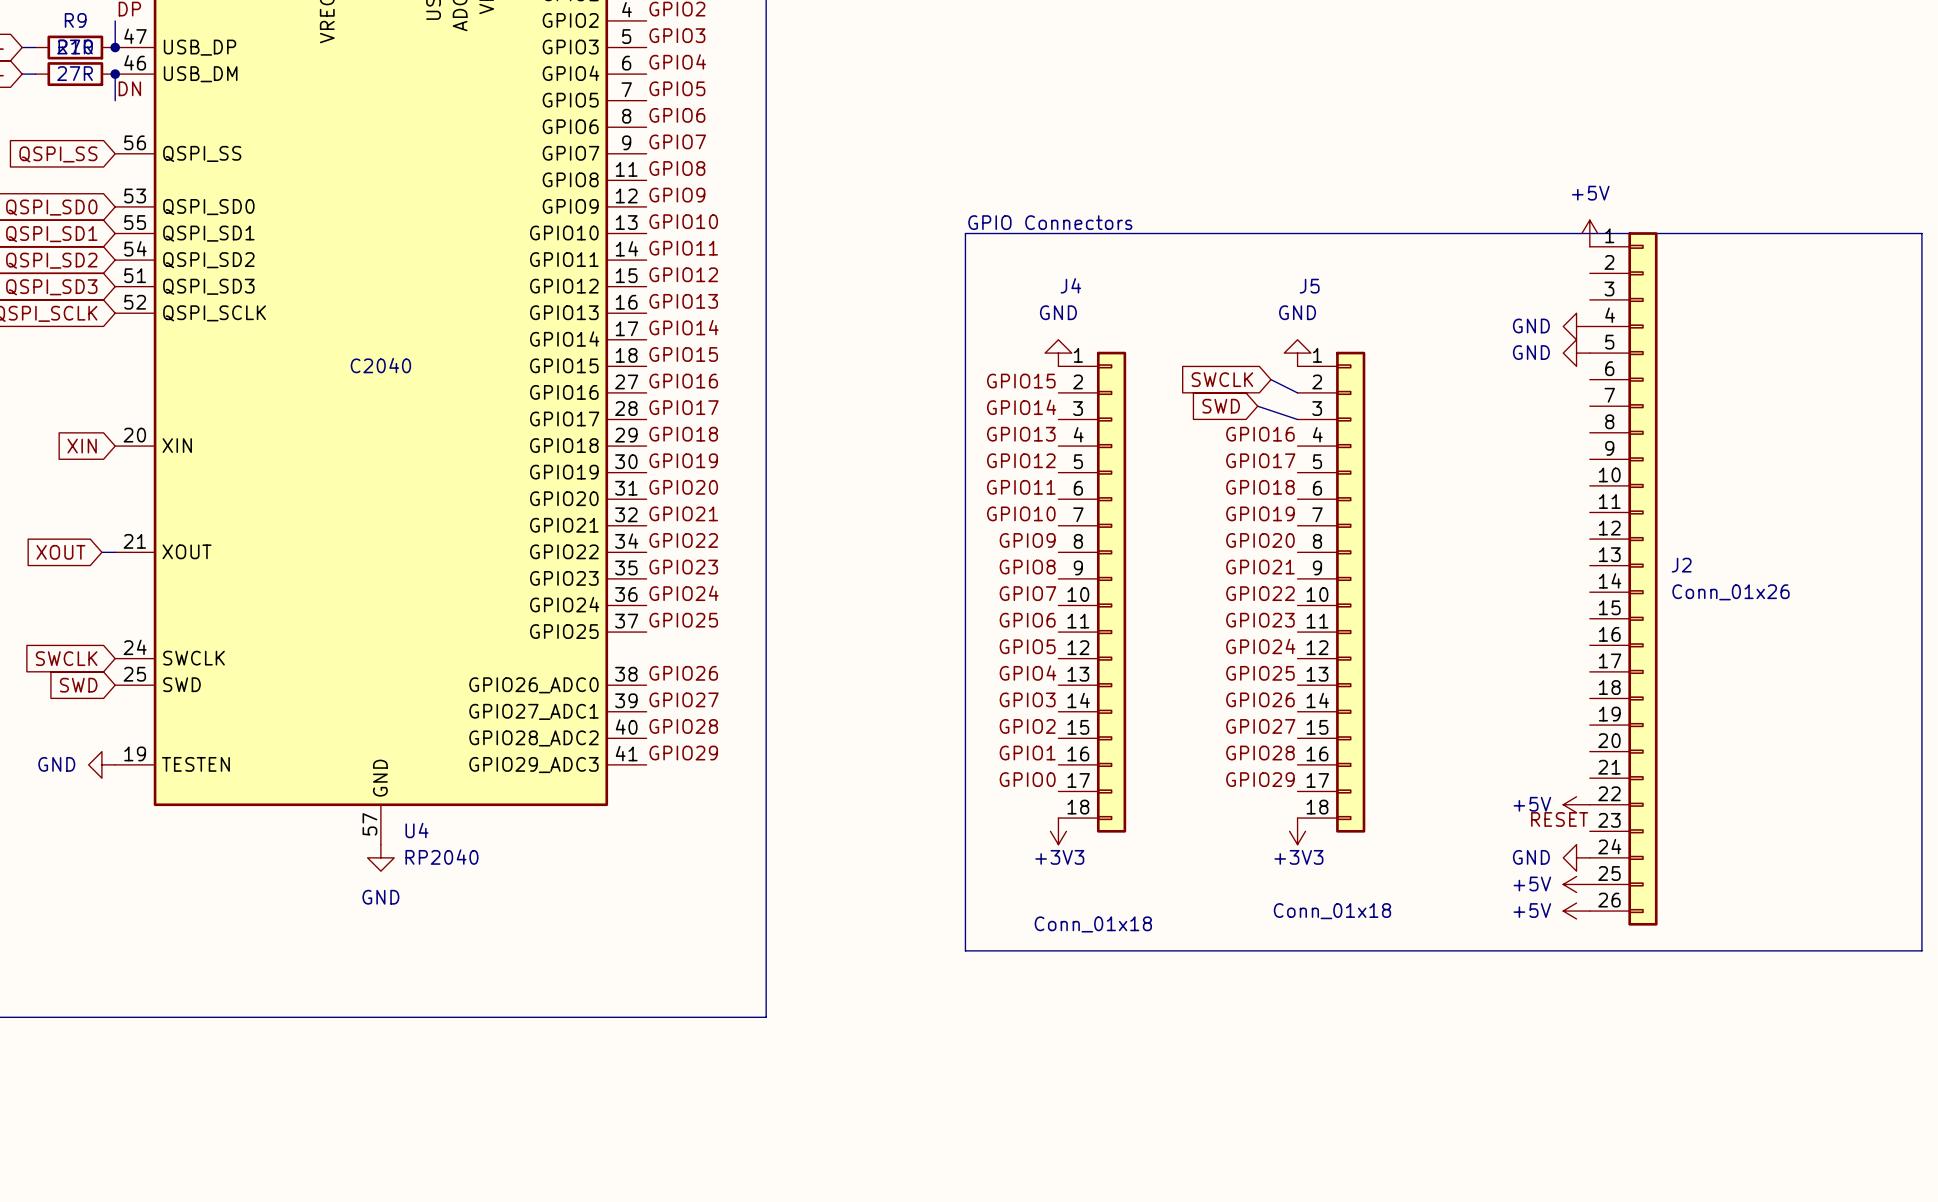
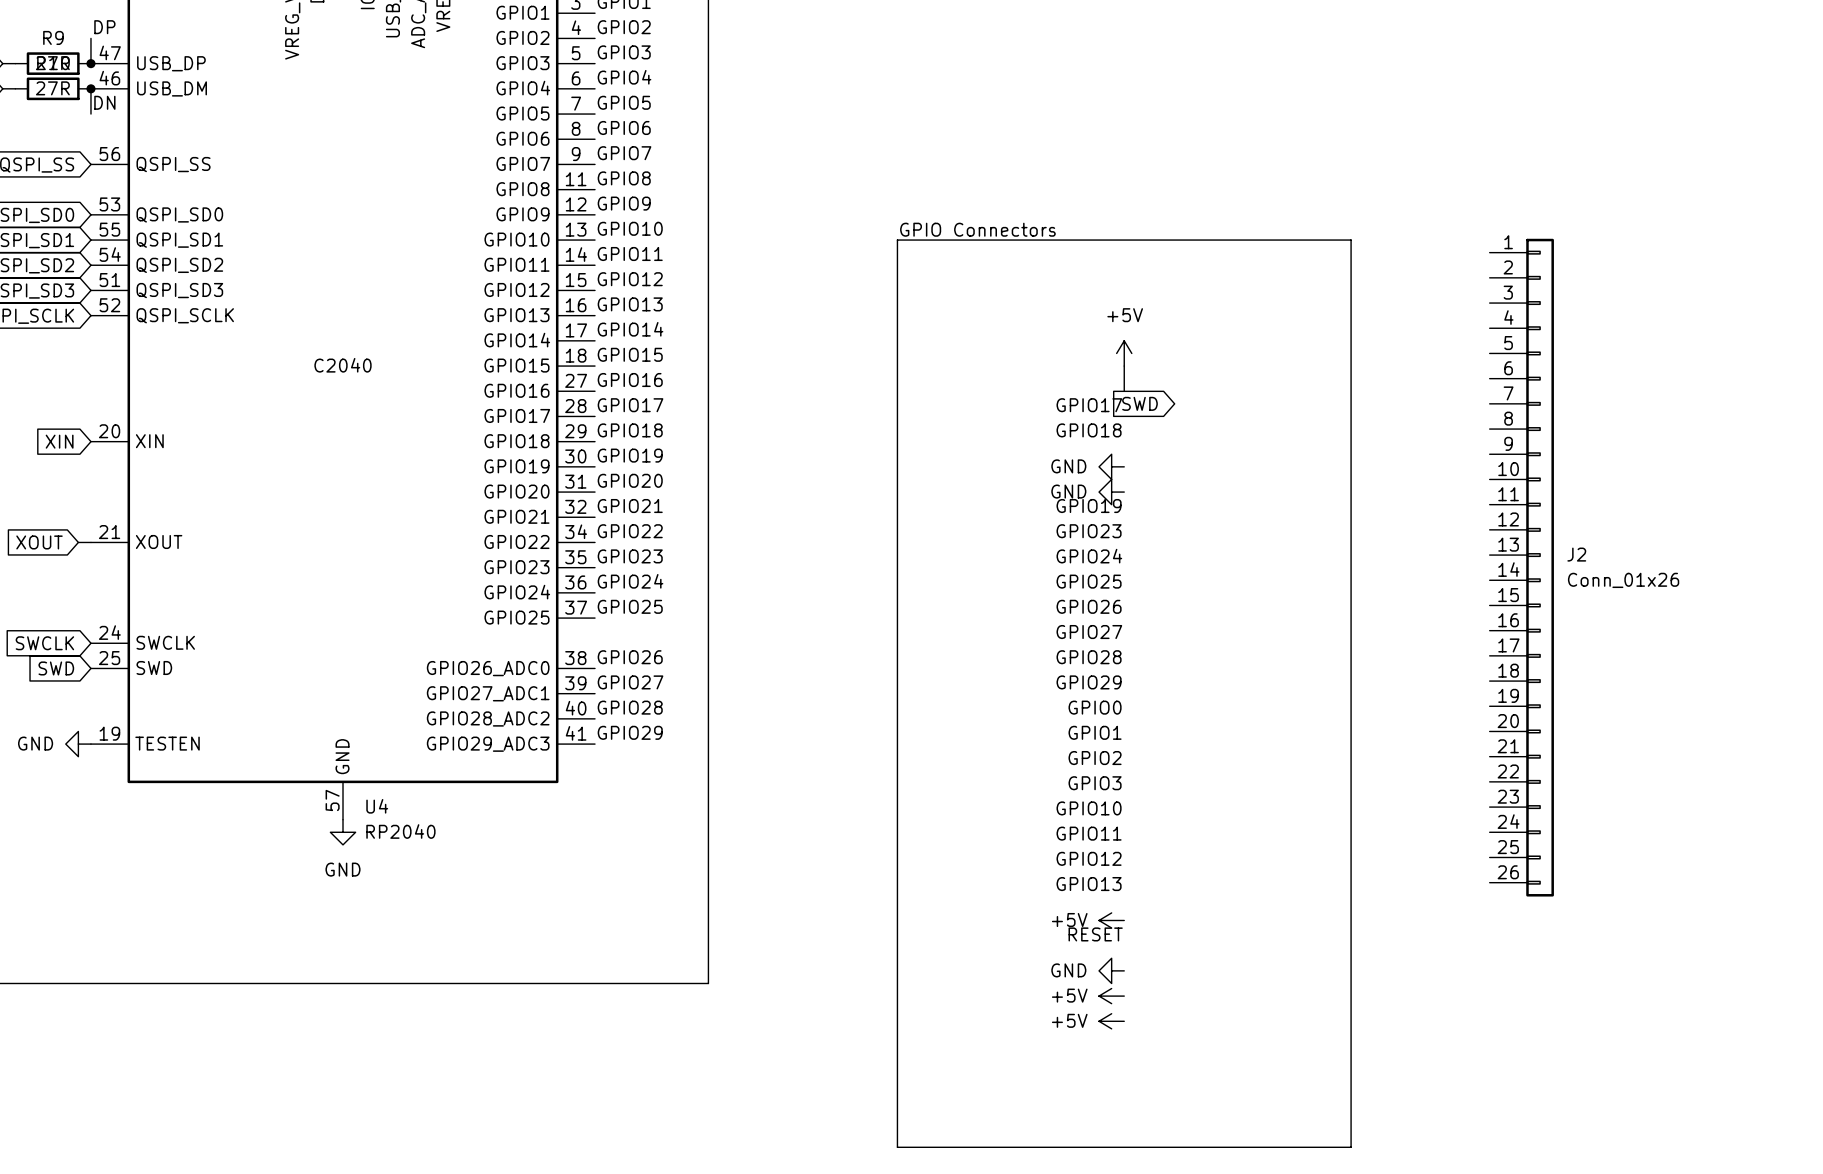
line: (1443, 233) (1921, 233) (1921, 950) (965, 950) -> (1351, 240) (1351, 1147) (897, 1147) (897, 920)
power symbol: +5V (1589, 233) -> none
power symbol: GND (1576, 326) -> none
power symbol: GND (1058, 353) -> none
power symbol: none -> +5V (1124, 353)
power symbol: GND (1297, 353) -> none
power symbol: GND (1576, 353) -> none
wire: none -> (1124, 366) (1124, 391)
global label: SWCLK (1222, 379) -> none
wire: (1270, 379) (1297, 392) -> none
label: GPIO15 (1021, 381) -> none
wire: (1257, 406) (1297, 419) -> none
label: GPIO14 (1021, 407) -> none
label: GPIO13 (1021, 434) -> none
label: GPIO16 (1260, 434) -> none
label: GPIO12 (1021, 460) -> none
label position: GPIO17 (1260, 460) -> GPIO17 (1089, 405)
power symbol: none -> GND (1111, 466)
label: GPIO11 (1021, 487) -> none
label position: GPIO18 (1260, 487) -> GPIO18 (1089, 430)
power symbol: none -> GND (1111, 492)
label: GPIO10 (1021, 513) -> none
label position: GPIO19 (1260, 513) -> GPIO19 (1089, 506)
label: GPIO9 (1027, 540) -> none
label: GPIO20 (1260, 540) -> none
label: GPIO8 (1027, 567) -> none
label: GPIO21 (1260, 567) -> none
J4: Conn_01x18 (1092, 592) -> none
J5: Conn_01x18 (1331, 592) -> none
label: GPIO7 (1027, 593) -> none
label: GPIO22 (1260, 593) -> none
label: GPIO6 (1027, 620) -> none
label position: GPIO23 (1260, 620) -> GPIO23 (1089, 531)
label: GPIO5 (1027, 646) -> none
label position: GPIO24 (1260, 646) -> GPIO24 (1089, 556)
label: GPIO4 (1027, 673) -> none
label position: GPIO25 (1260, 673) -> GPIO25 (1089, 581)
label position: GPIO3 (1027, 699) -> GPIO3 (1095, 783)
label position: GPIO26 (1260, 699) -> GPIO26 (1089, 606)
label position: GPIO2 (1027, 726) -> GPIO2 (1095, 758)
label position: GPIO27 (1260, 726) -> GPIO27 (1089, 632)
label position: GPIO1 (1027, 753) -> GPIO1 (1095, 732)
label position: GPIO28 (1260, 753) -> GPIO28 (1089, 657)
label position: GPIO0 (1027, 779) -> GPIO0 (1095, 707)
label position: GPIO29 (1260, 779) -> GPIO29 (1089, 682)
power symbol: +5V (1576, 804) -> none
label: RESET (1559, 819) -> none
power symbol: +3V3 (1058, 831) -> none
power symbol: +3V3 (1297, 831) -> none
label: none -> GPIO10 (1089, 808)
power symbol: GND (1576, 857) -> none
label: none -> GPIO11 (1089, 833)
power symbol: +5V (1576, 884) -> none
label: none -> GPIO12 (1089, 858)
power symbol: +5V (1576, 911) -> none
label: none -> GPIO13 (1089, 884)
power symbol: none -> +5V (1111, 920)
label: none -> RESET (1095, 934)
power symbol: none -> GND (1111, 970)
power symbol: none -> +5V (1111, 996)
power symbol: none -> +5V (1111, 1021)

